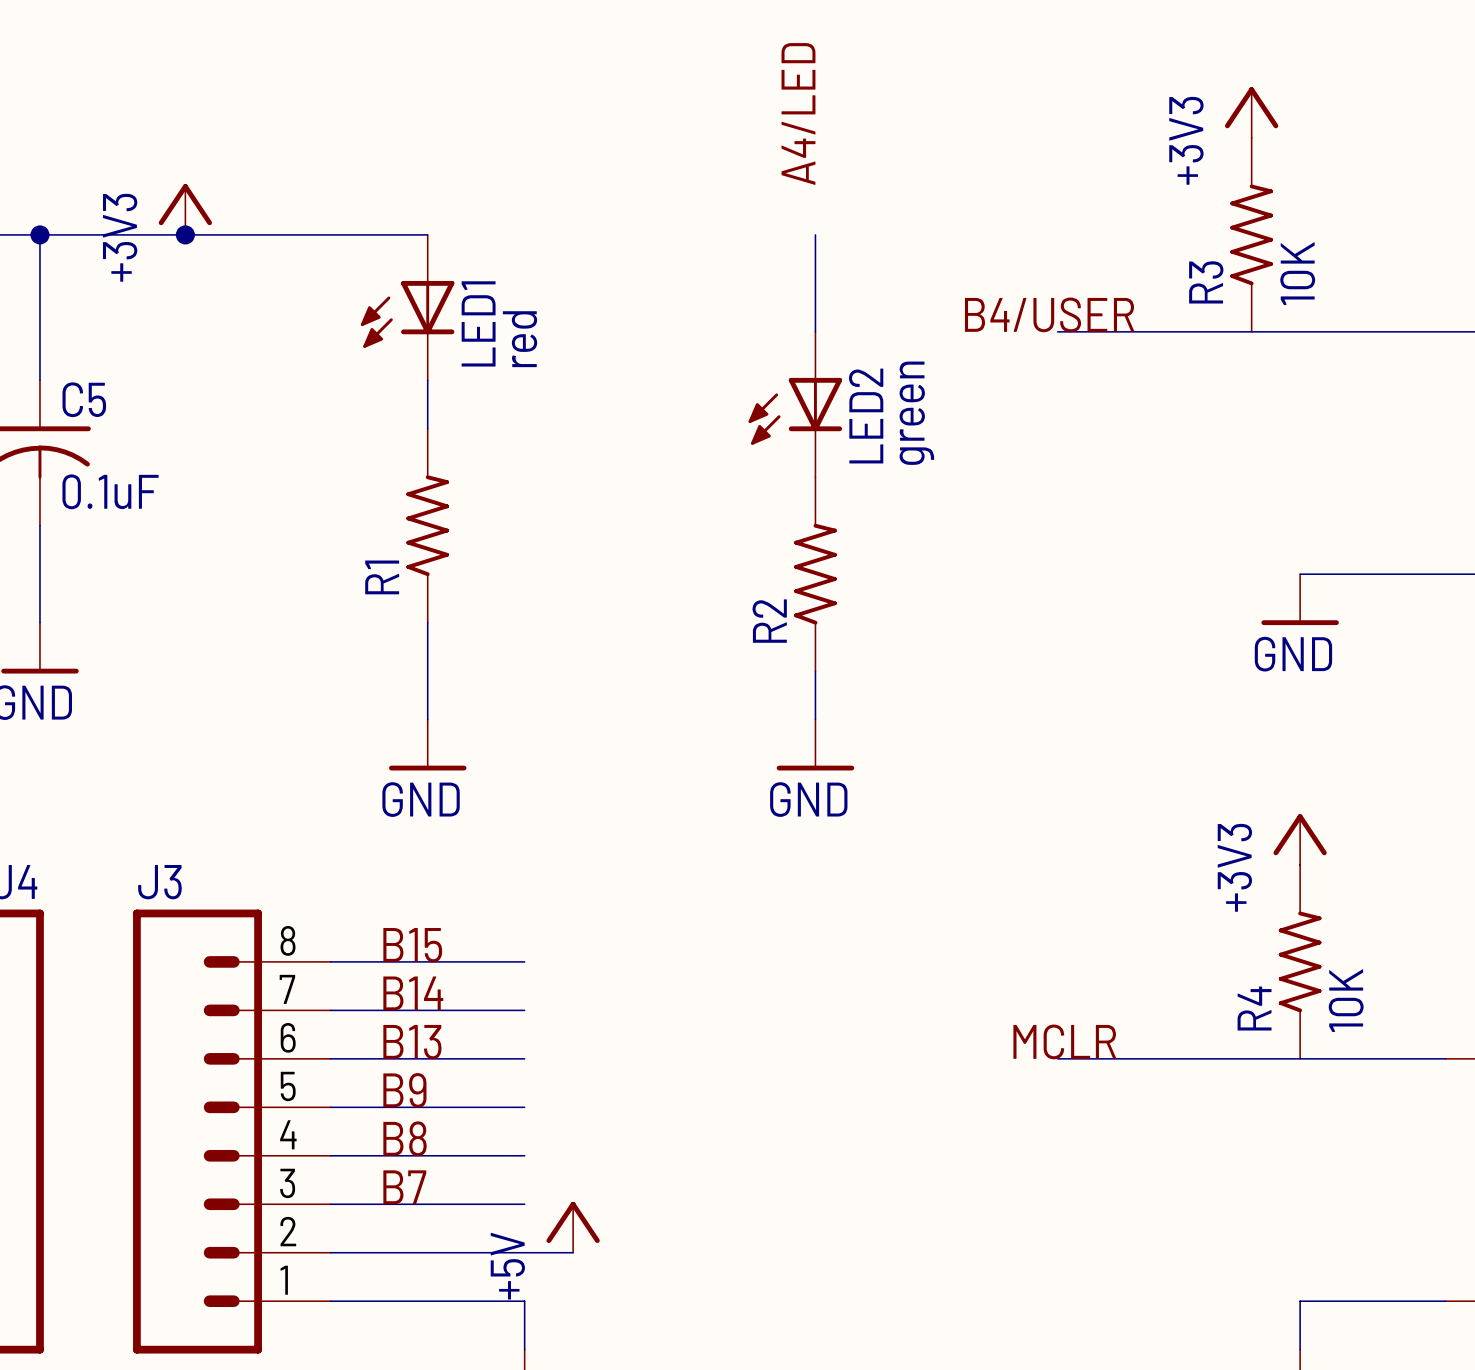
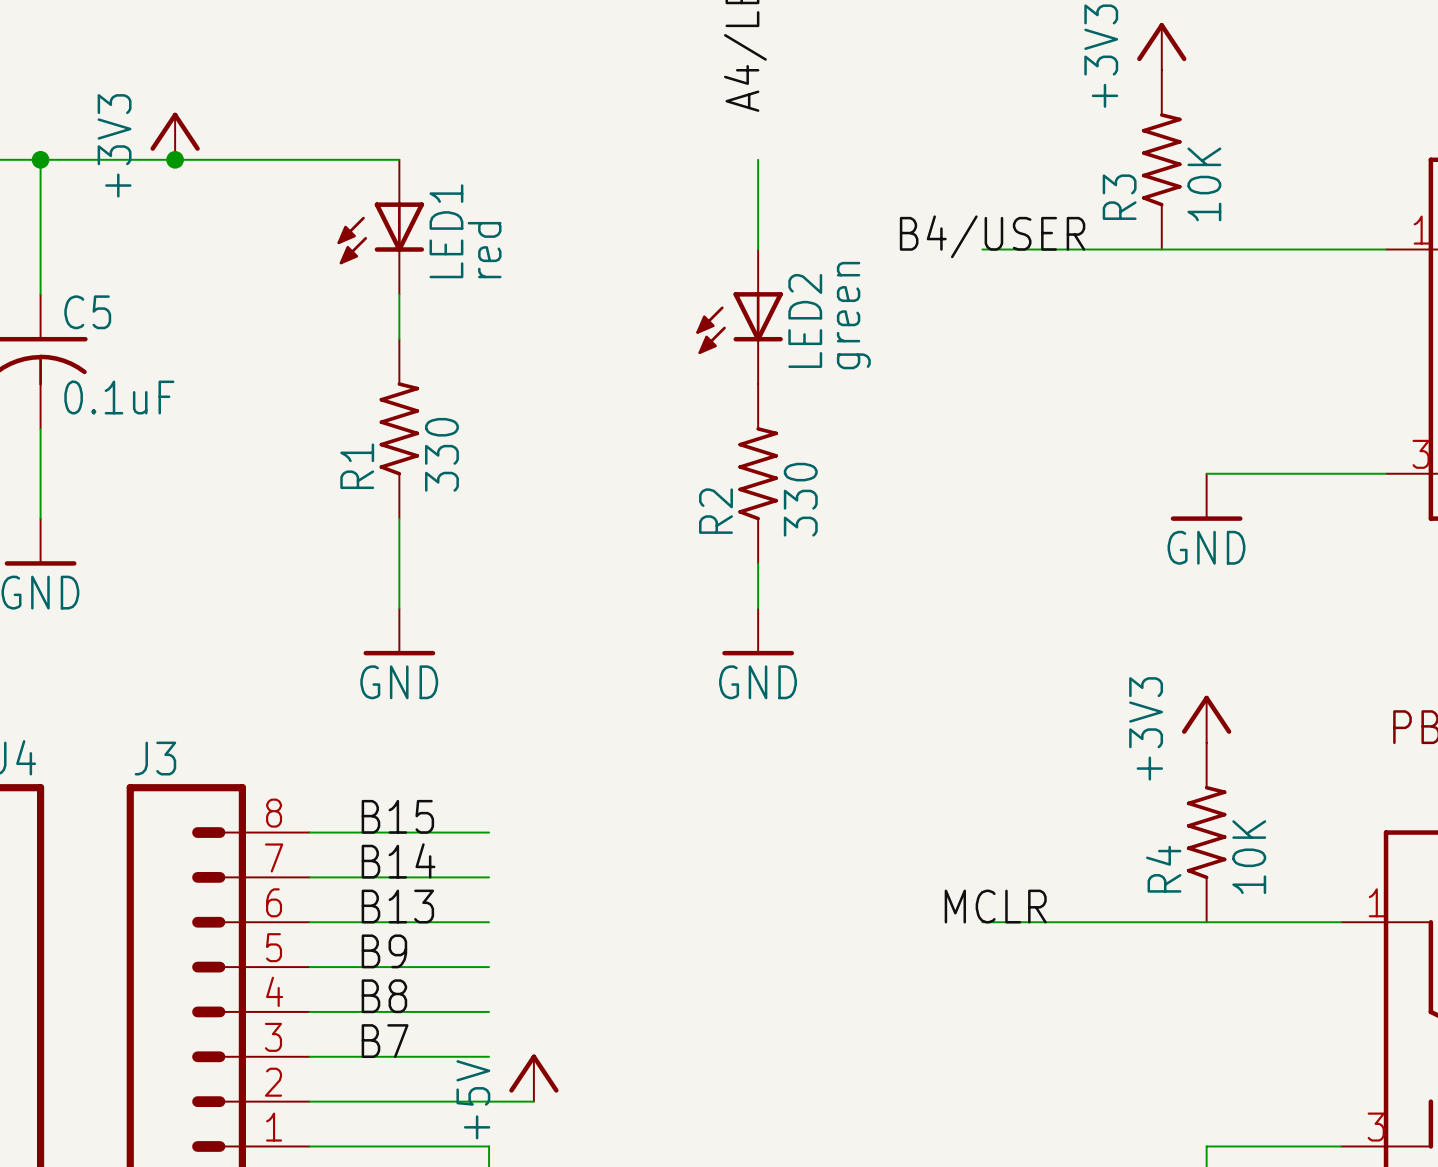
R1 value: none -> 330 (441, 454)
R2 value: none -> 330 (800, 499)

